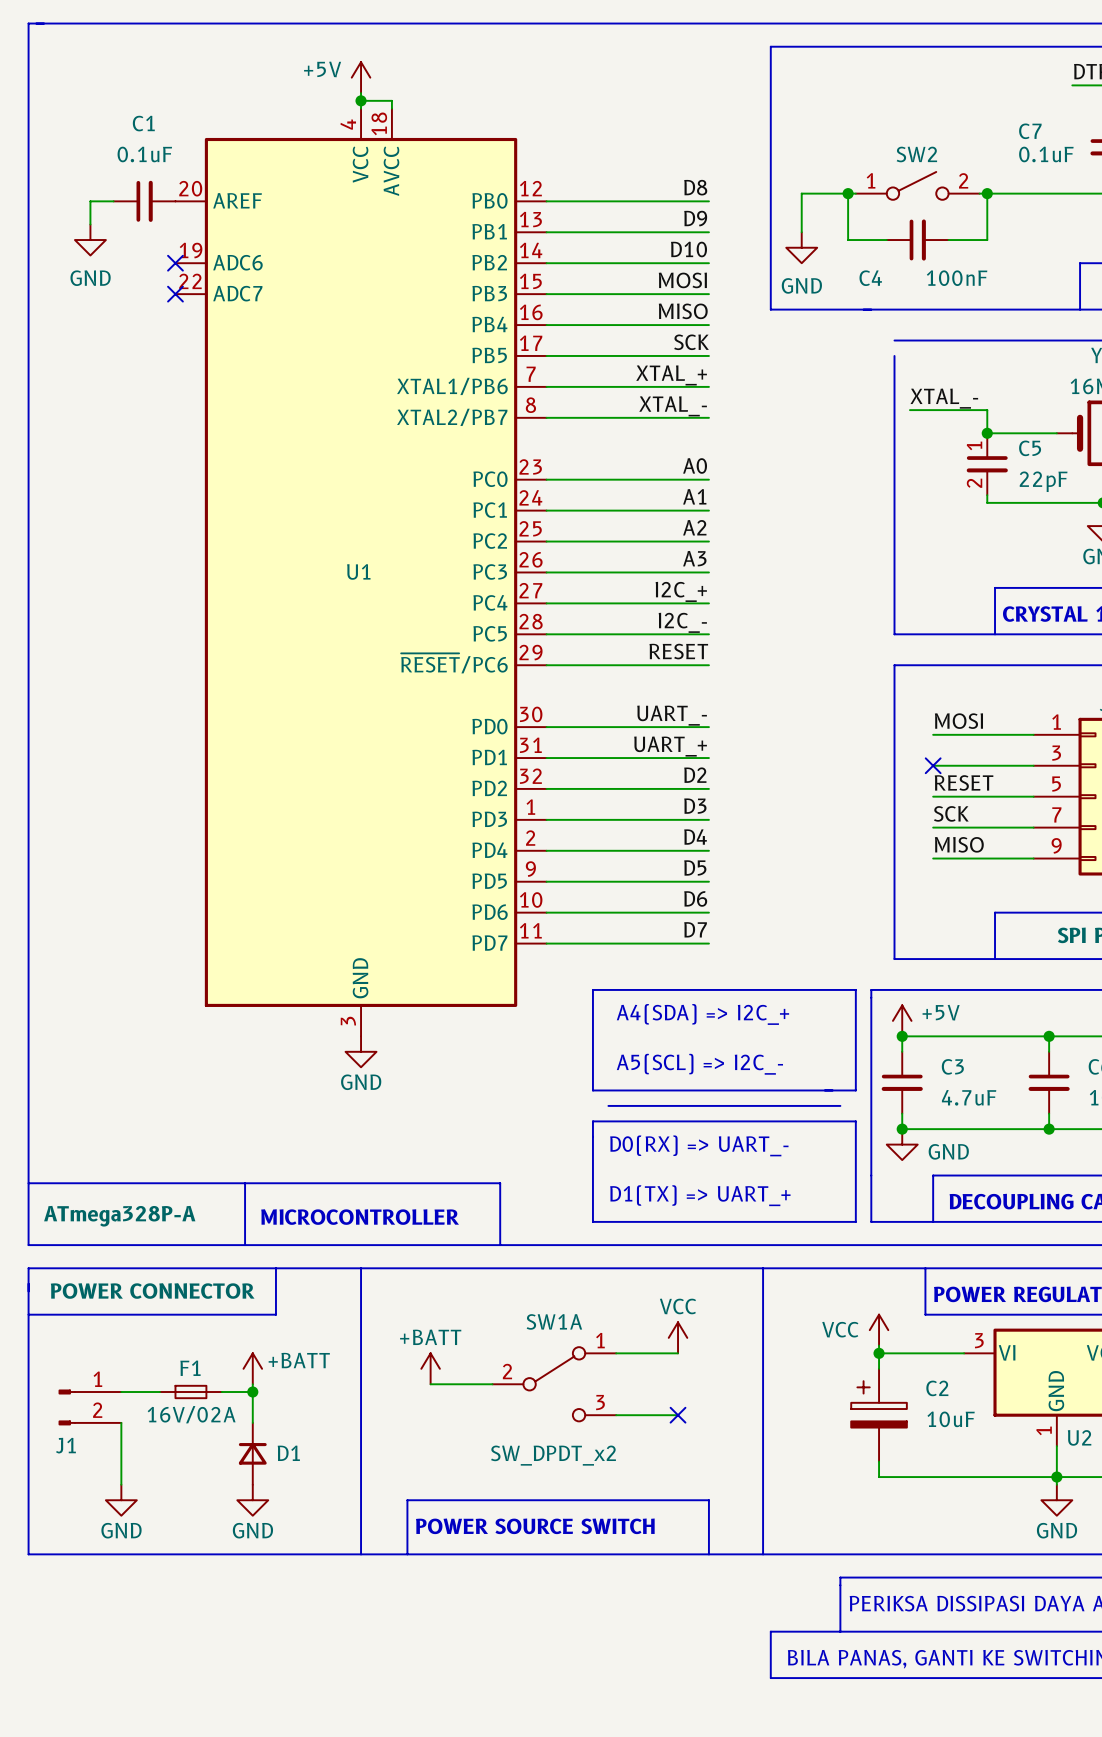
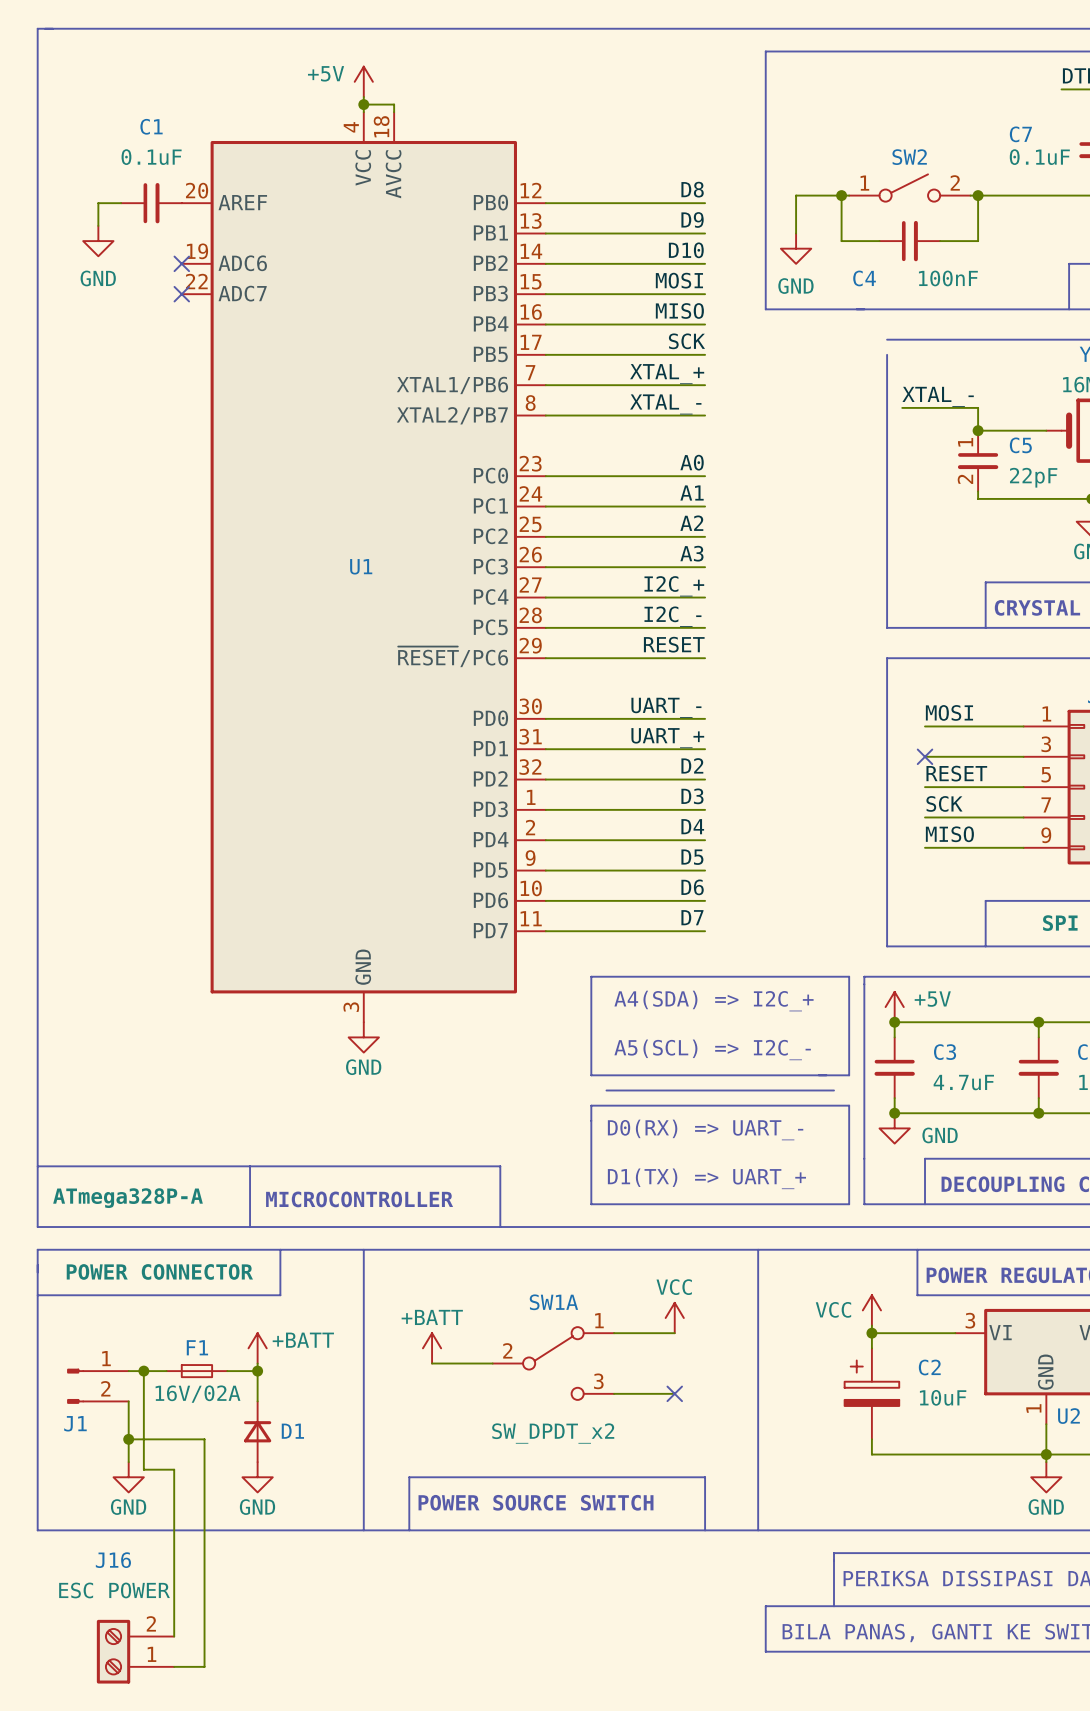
wire: none -> (143, 1371) (143, 1469) (174, 1469) (174, 1636)
junction: none -> (143, 1371)
wire: none -> (128, 1439) (204, 1439) (204, 1666) (174, 1666)
junction: none -> (128, 1439)
J16: none -> ESC POWER (135, 1651)

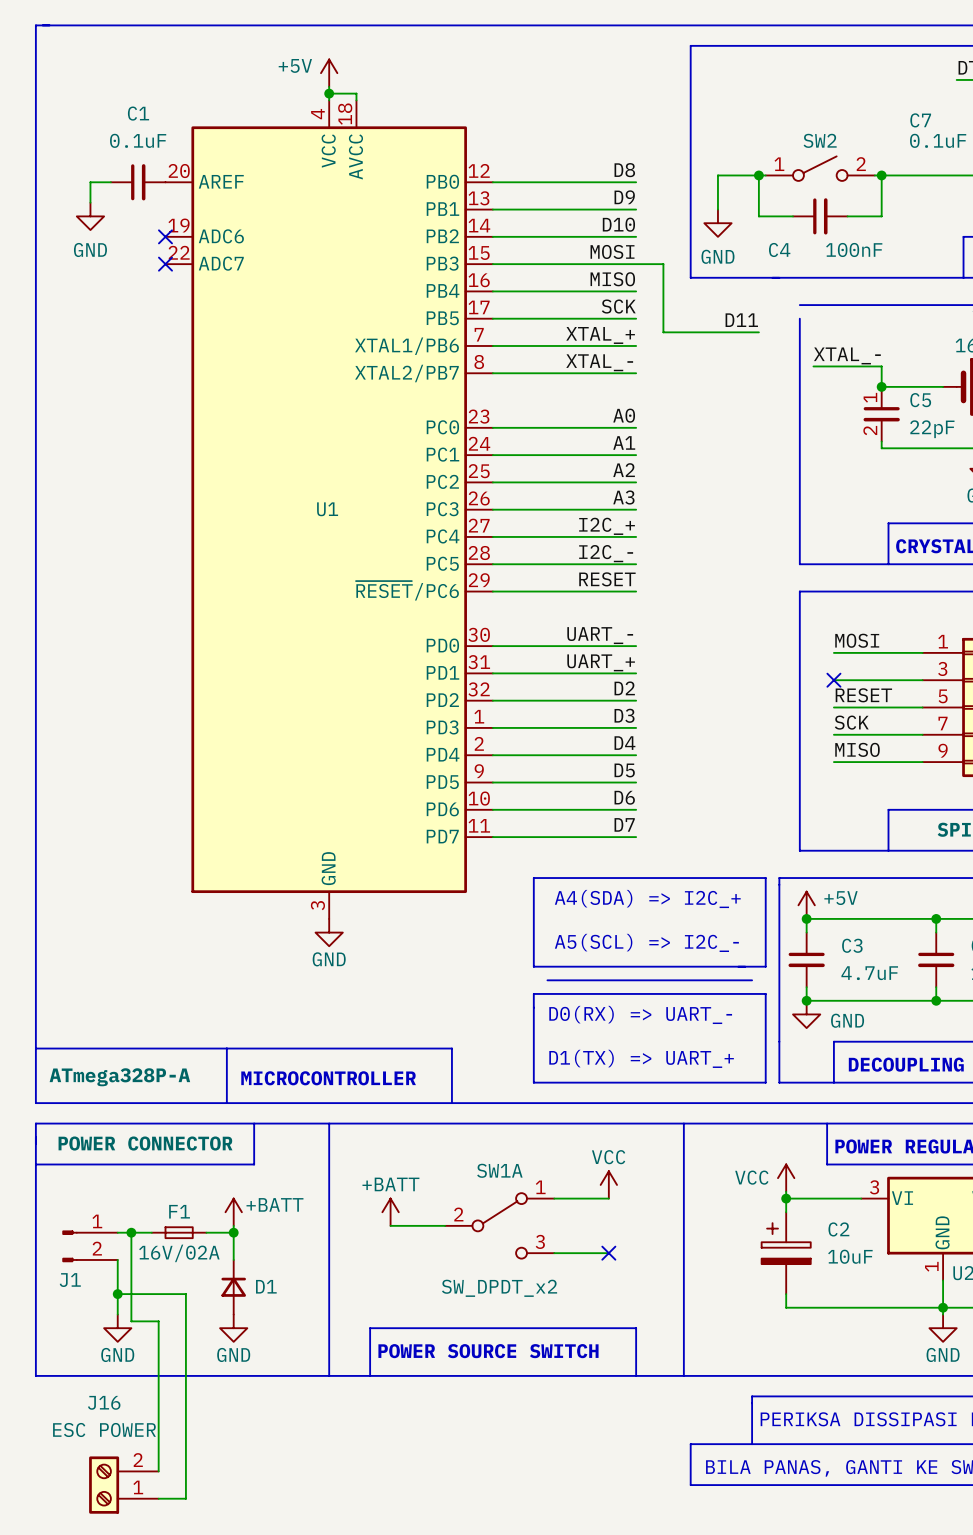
wire: none -> (636, 264) (663, 264) (663, 332) (758, 332)
label: none -> D11 (741, 320)

